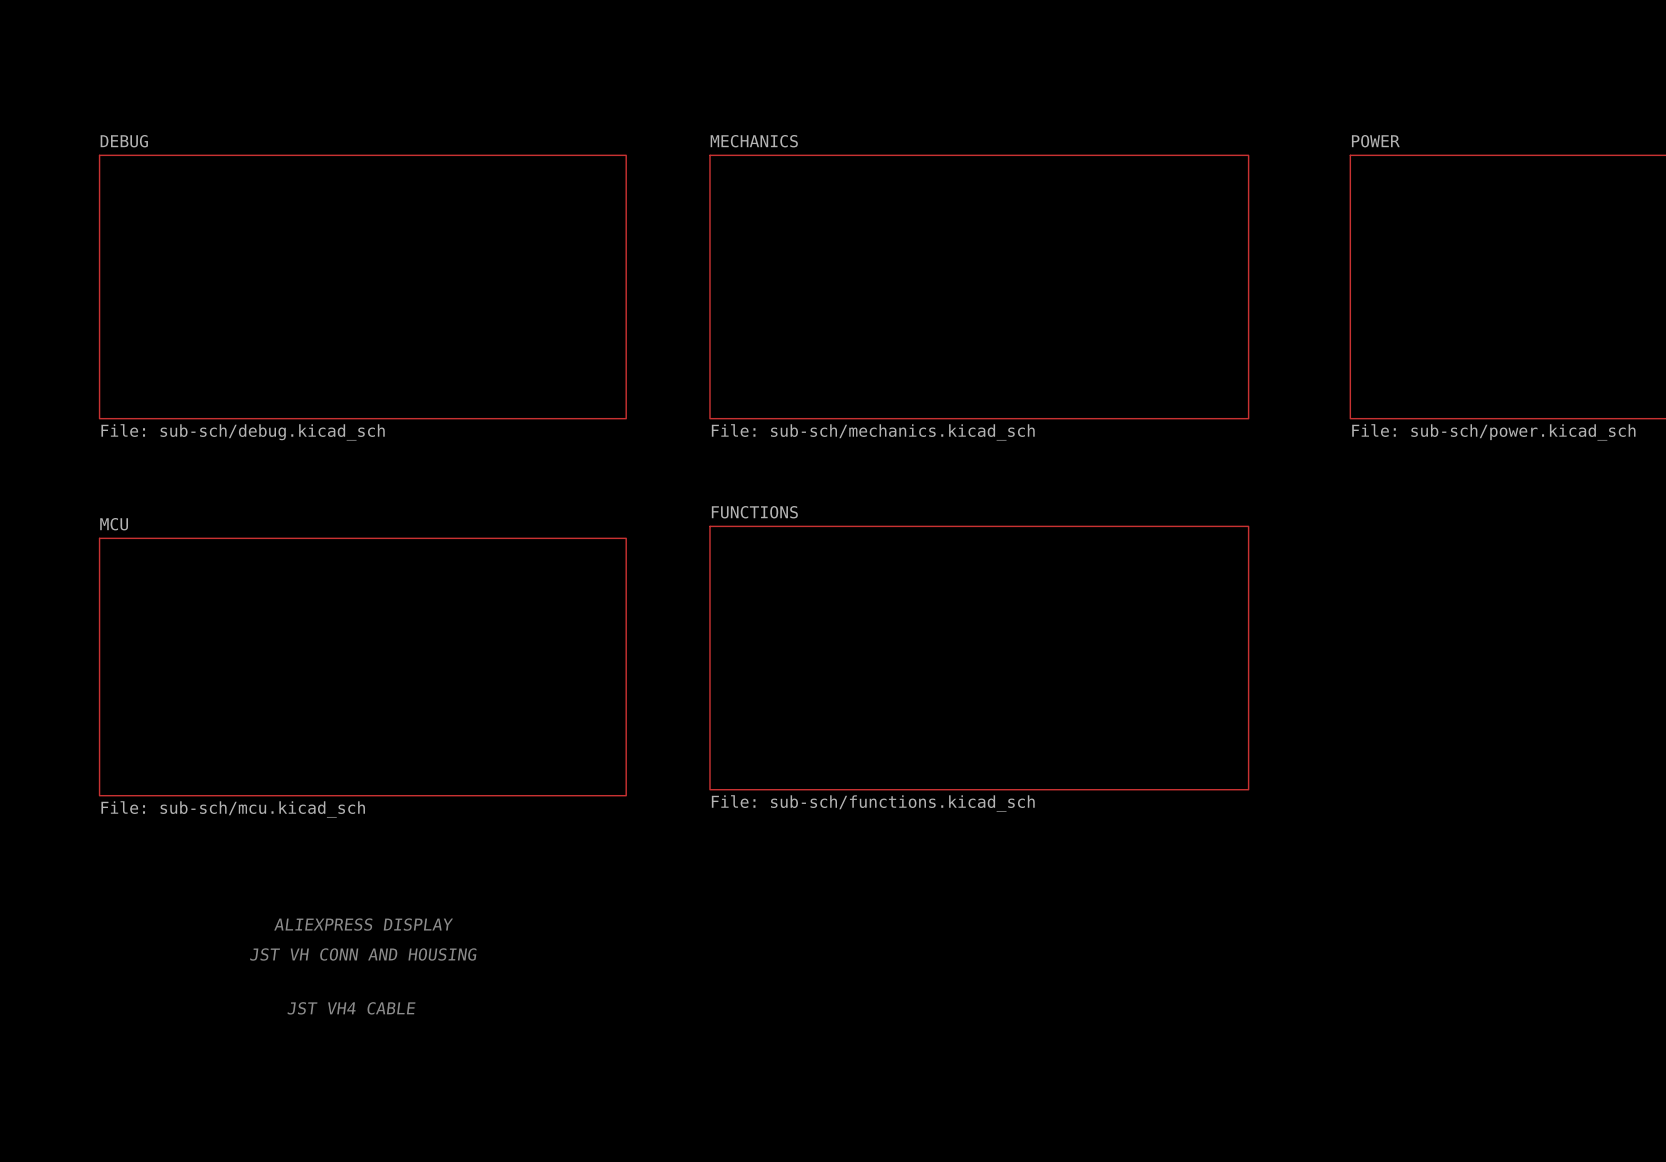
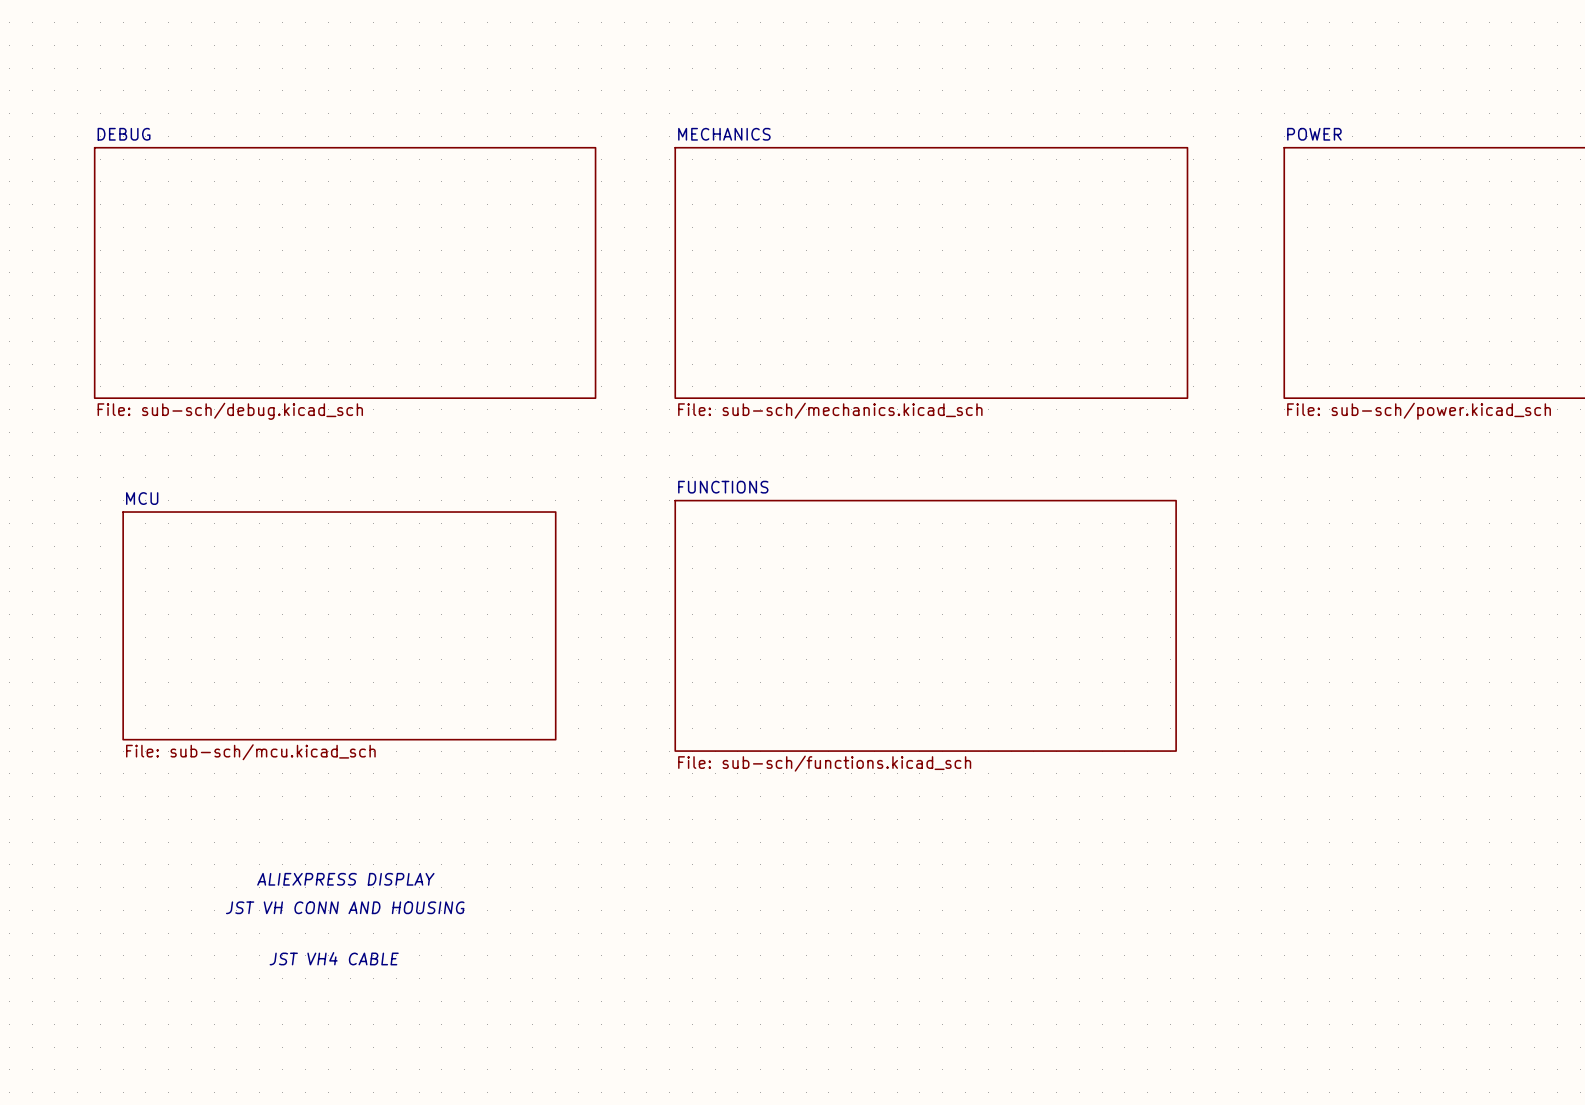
sheet FUNCTIONS shape: [709, 525, 1250, 791] -> [674, 499, 1177, 752]
sheet MCU: none -> File: sub-sch/mcu.kicad_sch (339, 625)
sheet MCU: File: sub-sch/mcu.kicad_sch (362, 667) -> none

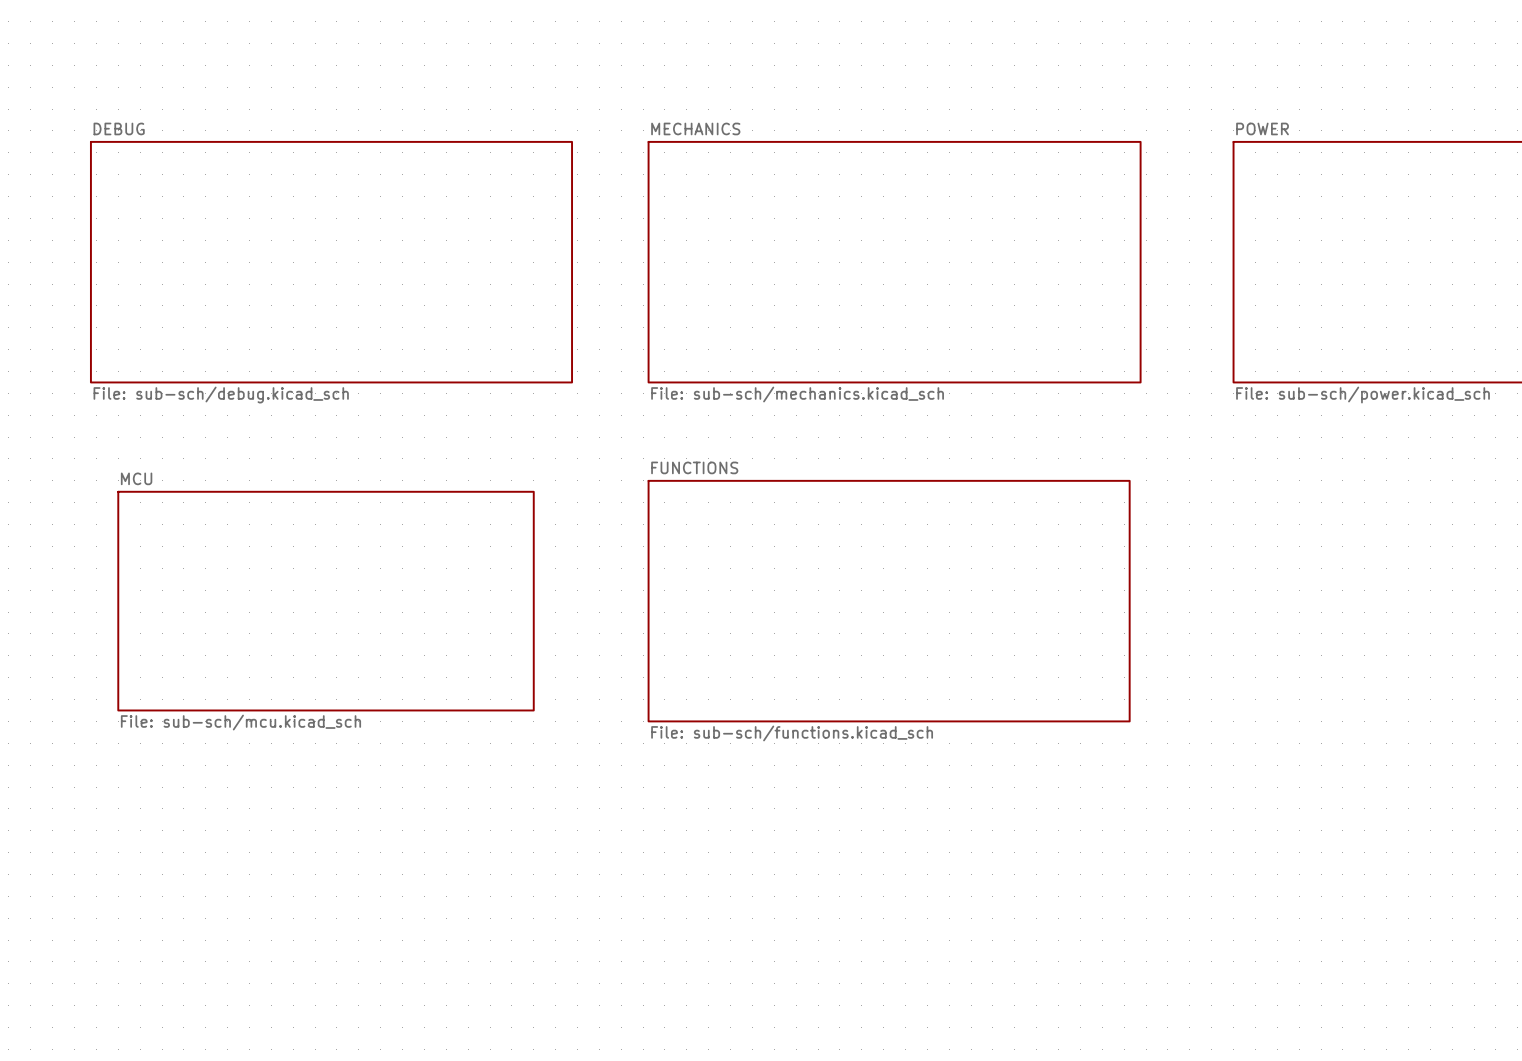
text: ALIEXPRESS DISPLAY (345, 879) -> none
text: JST VH CONN AND HOUSING (345, 907) -> none
text: JST VH4 CABLE (334, 958) -> none

